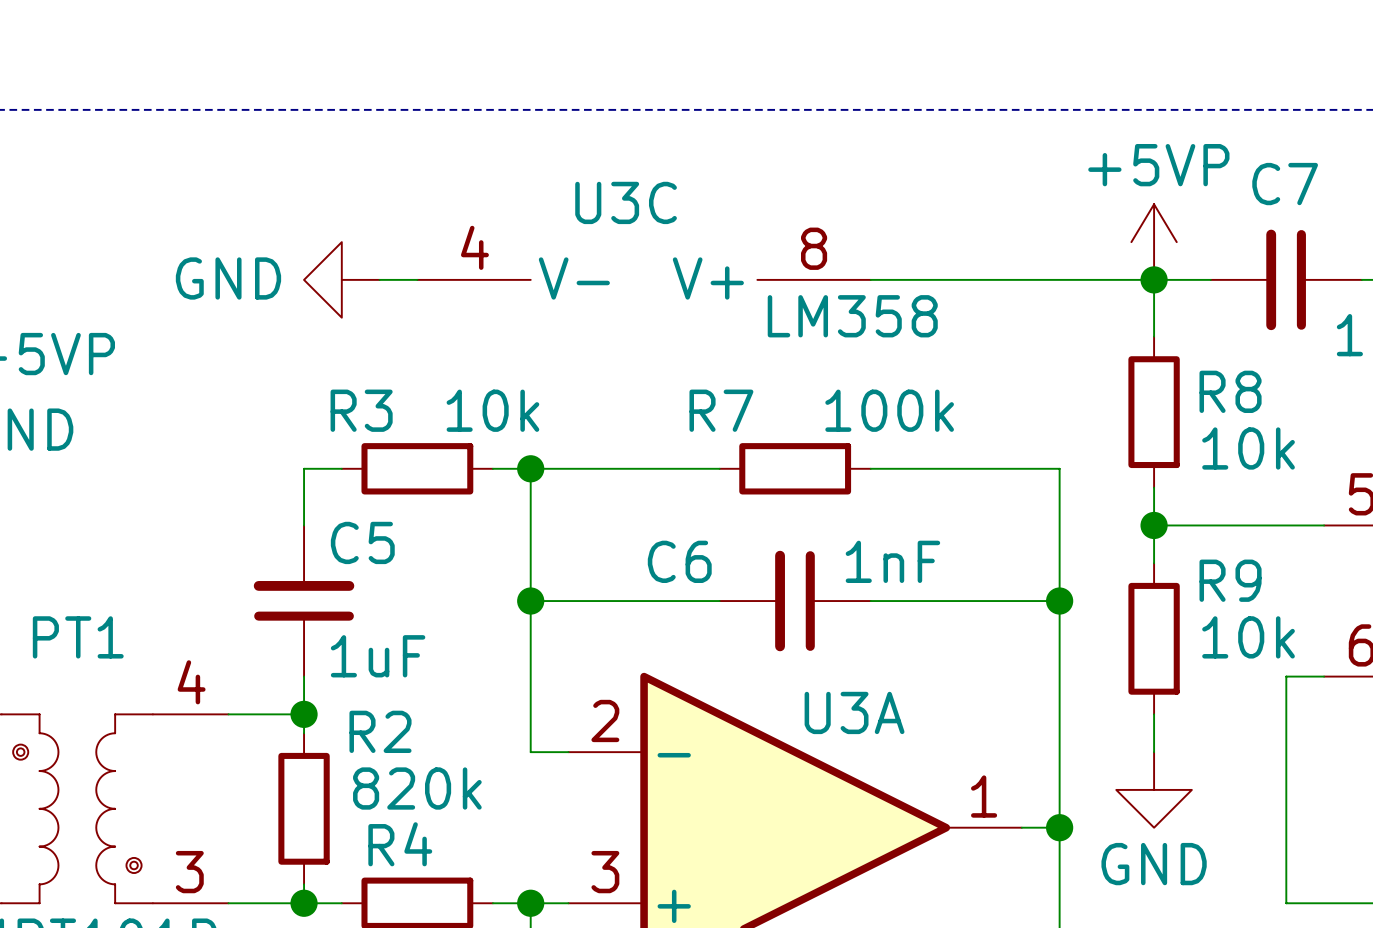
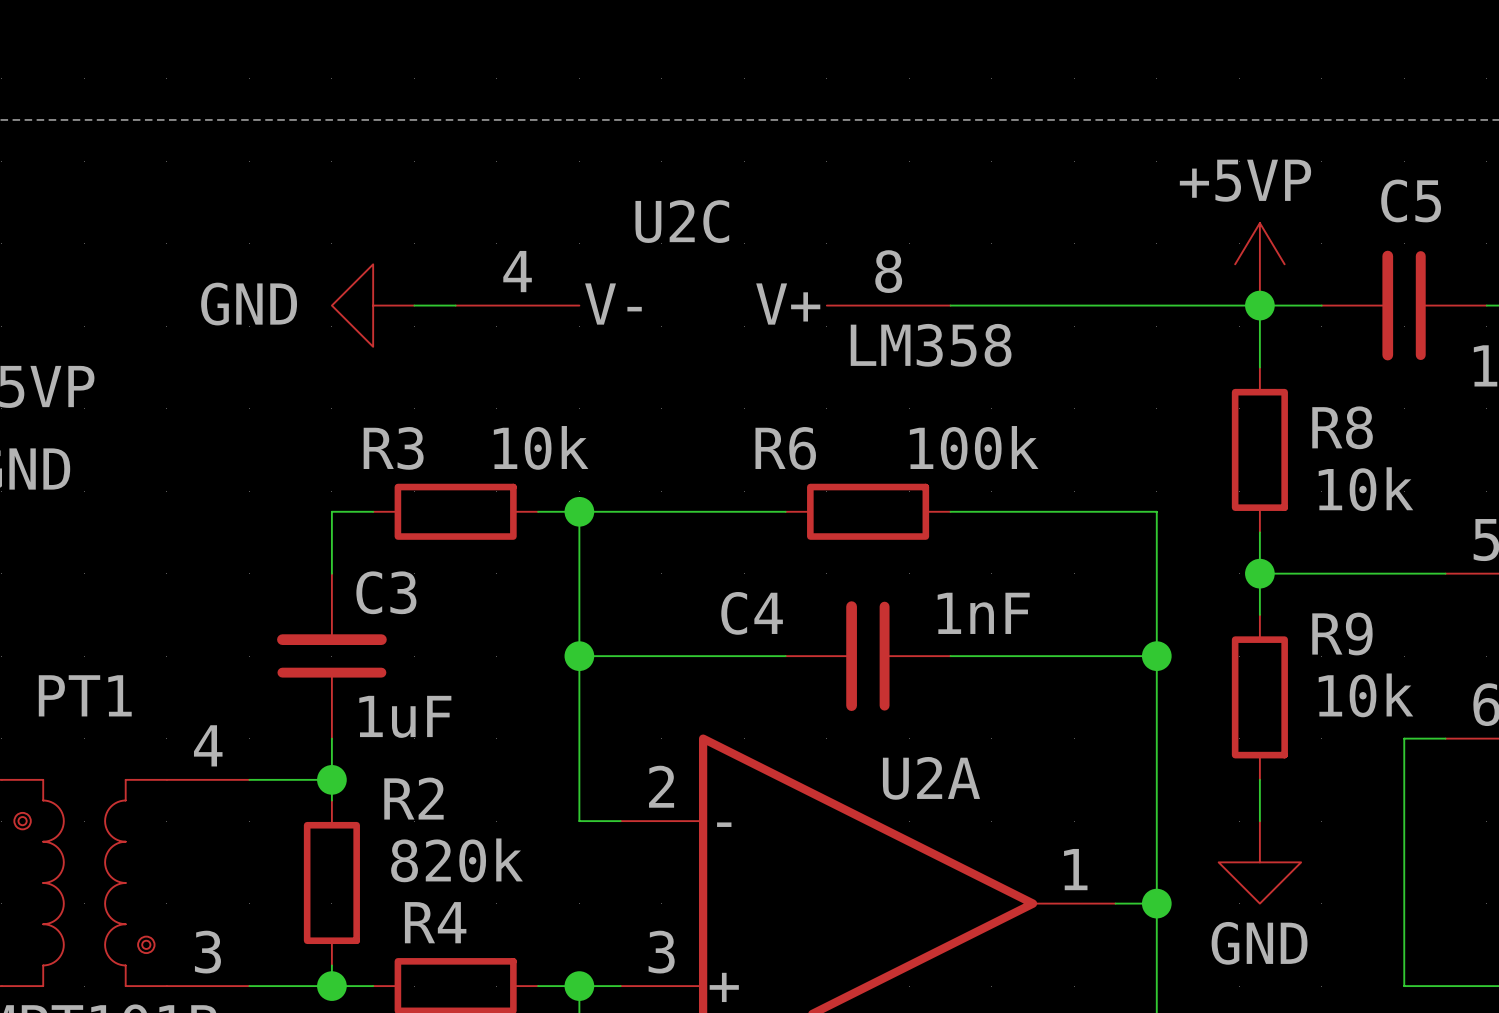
C7 name: C7 (1285, 184) -> C5 (1411, 200)
U3C name: U3C (626, 202) -> U2C (682, 221)
R7 name: R7 (721, 410) -> R6 (785, 448)
C5 name: C5 (362, 542) -> C3 (386, 592)
C6 name: C6 (679, 561) -> C4 (752, 613)
U3A name: U3A (854, 712) -> U2A (931, 778)

